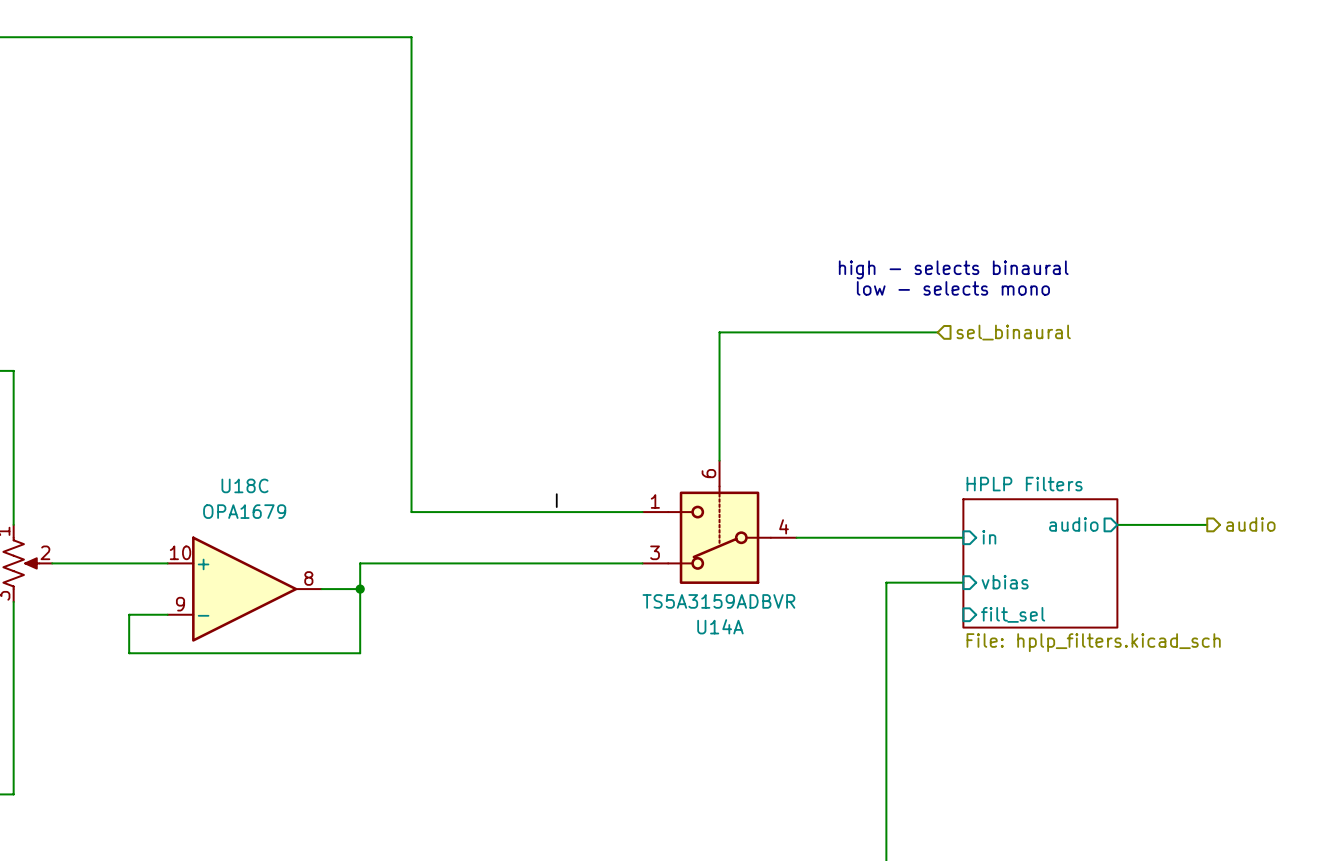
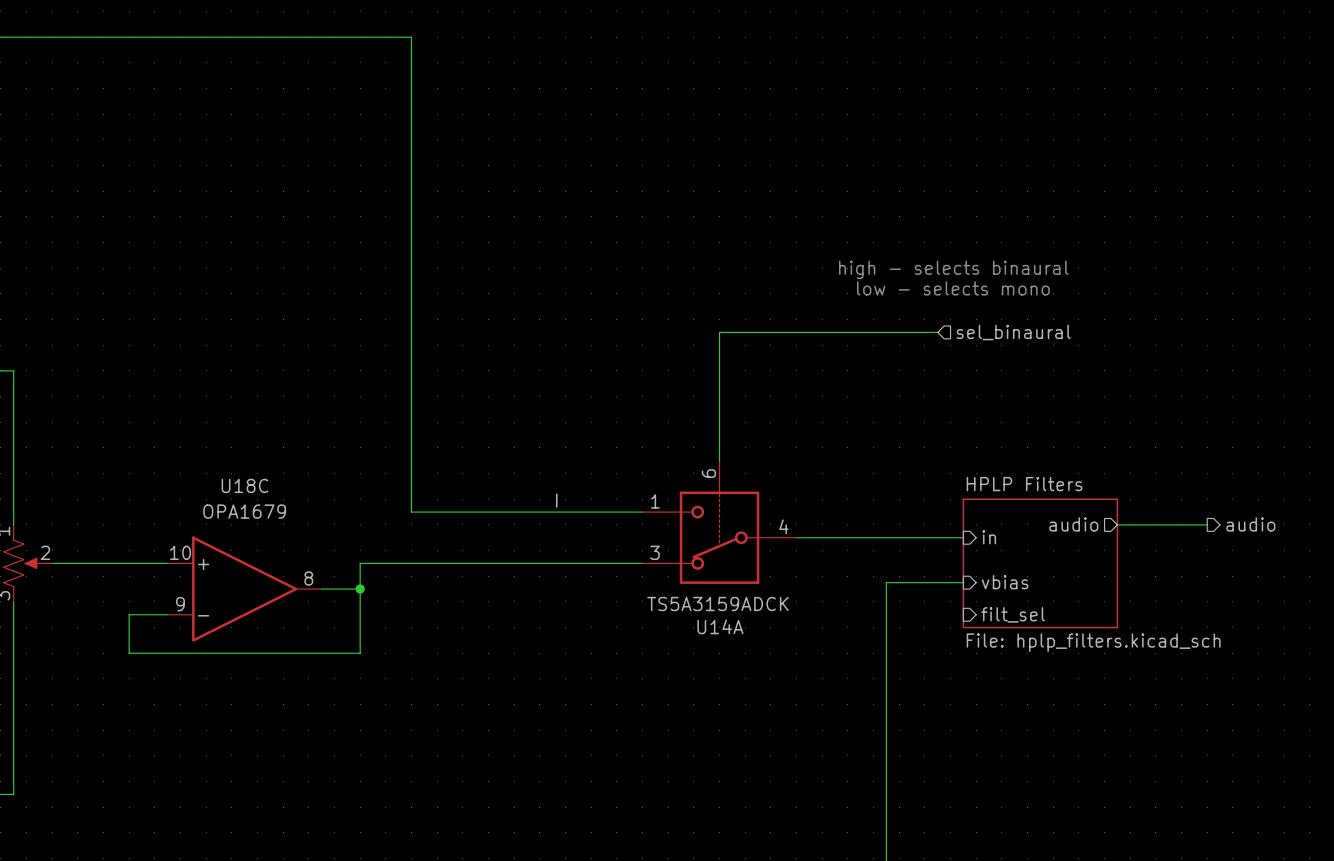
U14A value: TS5A3159ADBVR (718, 601) -> TS5A3159ADCK (717, 604)

